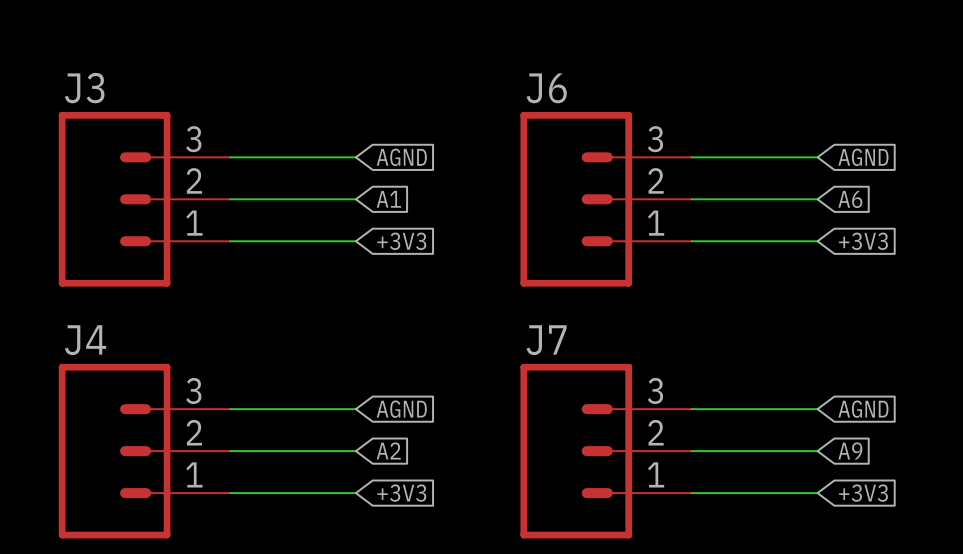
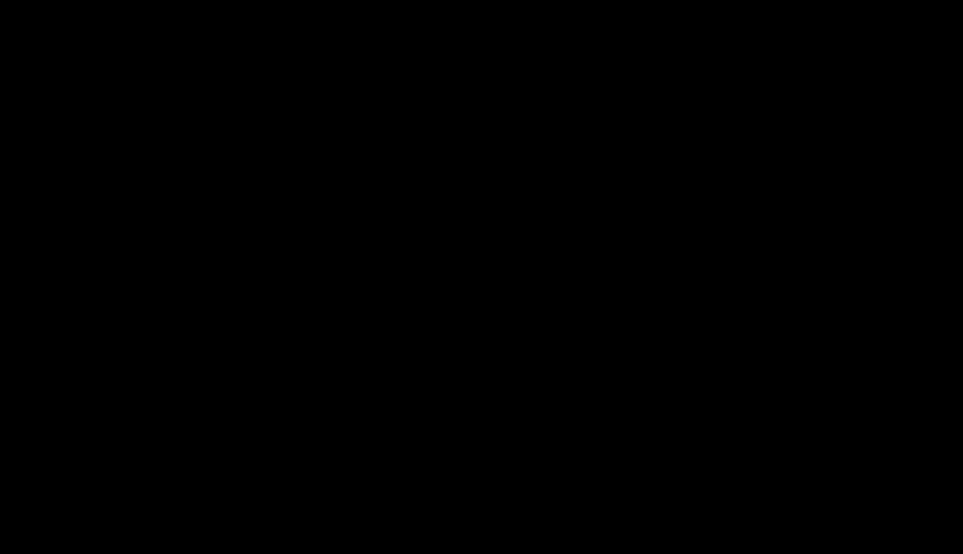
wire: (230, 157) (355, 157) -> none
global label: AGND (401, 157) -> none
wire: (691, 157) (817, 157) -> none
global label: AGND (863, 157) -> none
J3: (144, 199) -> none
wire: (230, 199) (355, 199) -> none
global label: A1 (388, 199) -> none
J6: (606, 199) -> none
wire: (691, 199) (817, 199) -> none
global label: A6 (850, 199) -> none
wire: (230, 241) (355, 241) -> none
global label: +3V3 (401, 241) -> none
wire: (691, 241) (817, 241) -> none
global label: +3V3 (863, 241) -> none
wire: (230, 409) (355, 409) -> none
global label: AGND (401, 409) -> none
wire: (691, 409) (817, 409) -> none
global label: AGND (863, 409) -> none
global label: A2 (388, 450) -> none
global label: A9 (850, 450) -> none
J4: (144, 451) -> none
wire: (230, 451) (355, 451) -> none
J7: (606, 451) -> none
wire: (691, 451) (817, 451) -> none
wire: (230, 493) (355, 493) -> none
global label: +3V3 (401, 493) -> none
wire: (691, 493) (817, 493) -> none
global label: +3V3 (863, 493) -> none

